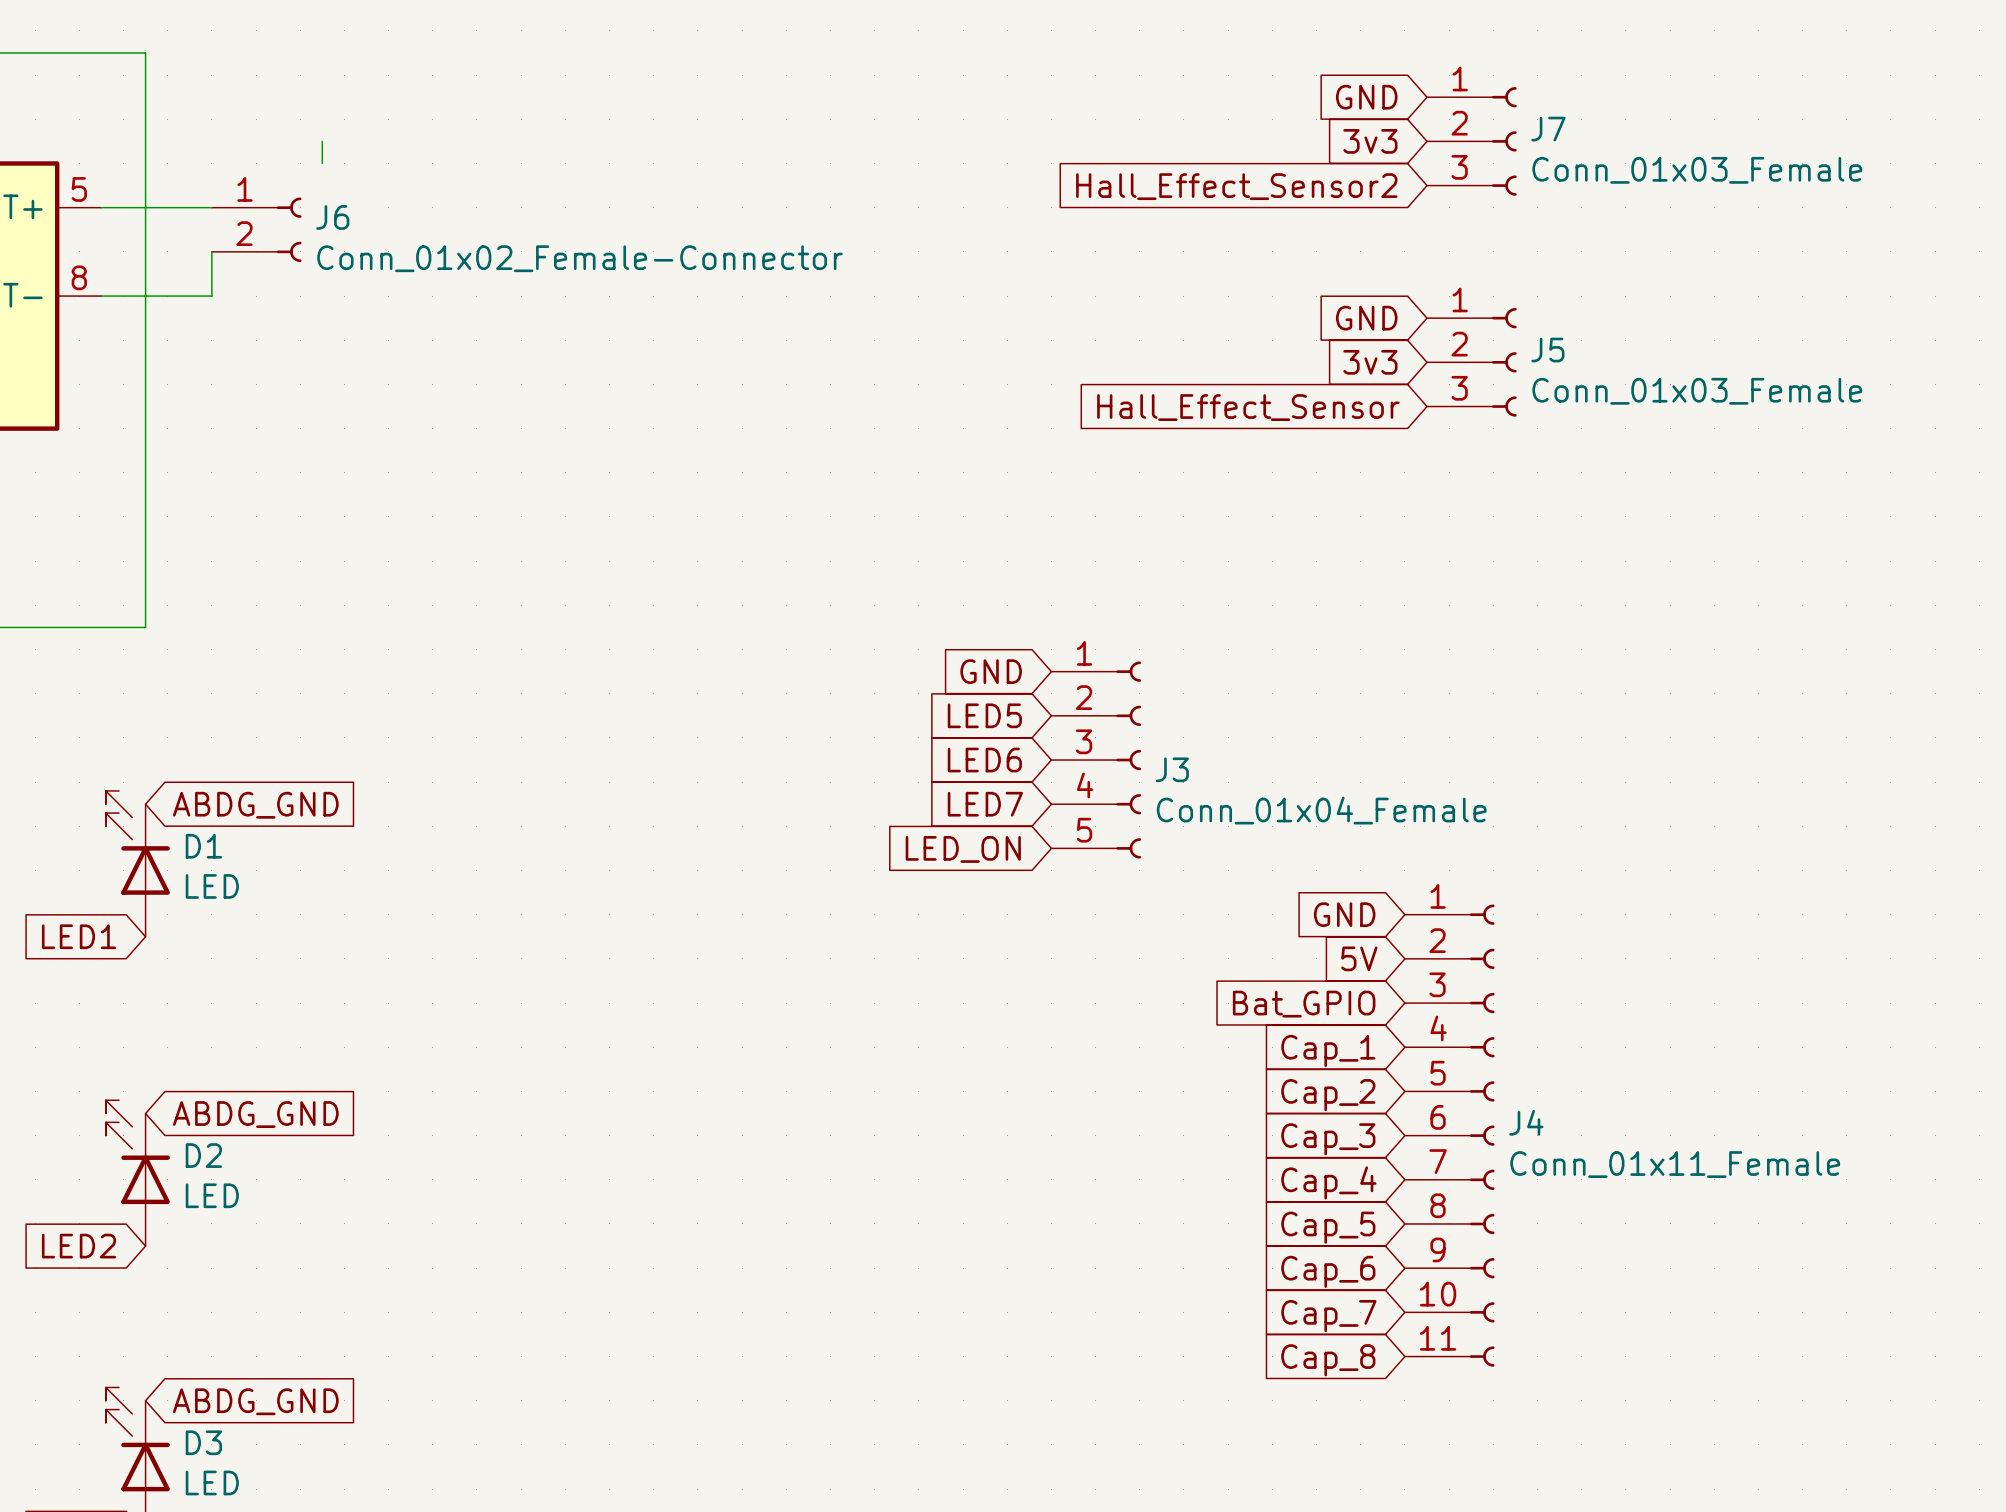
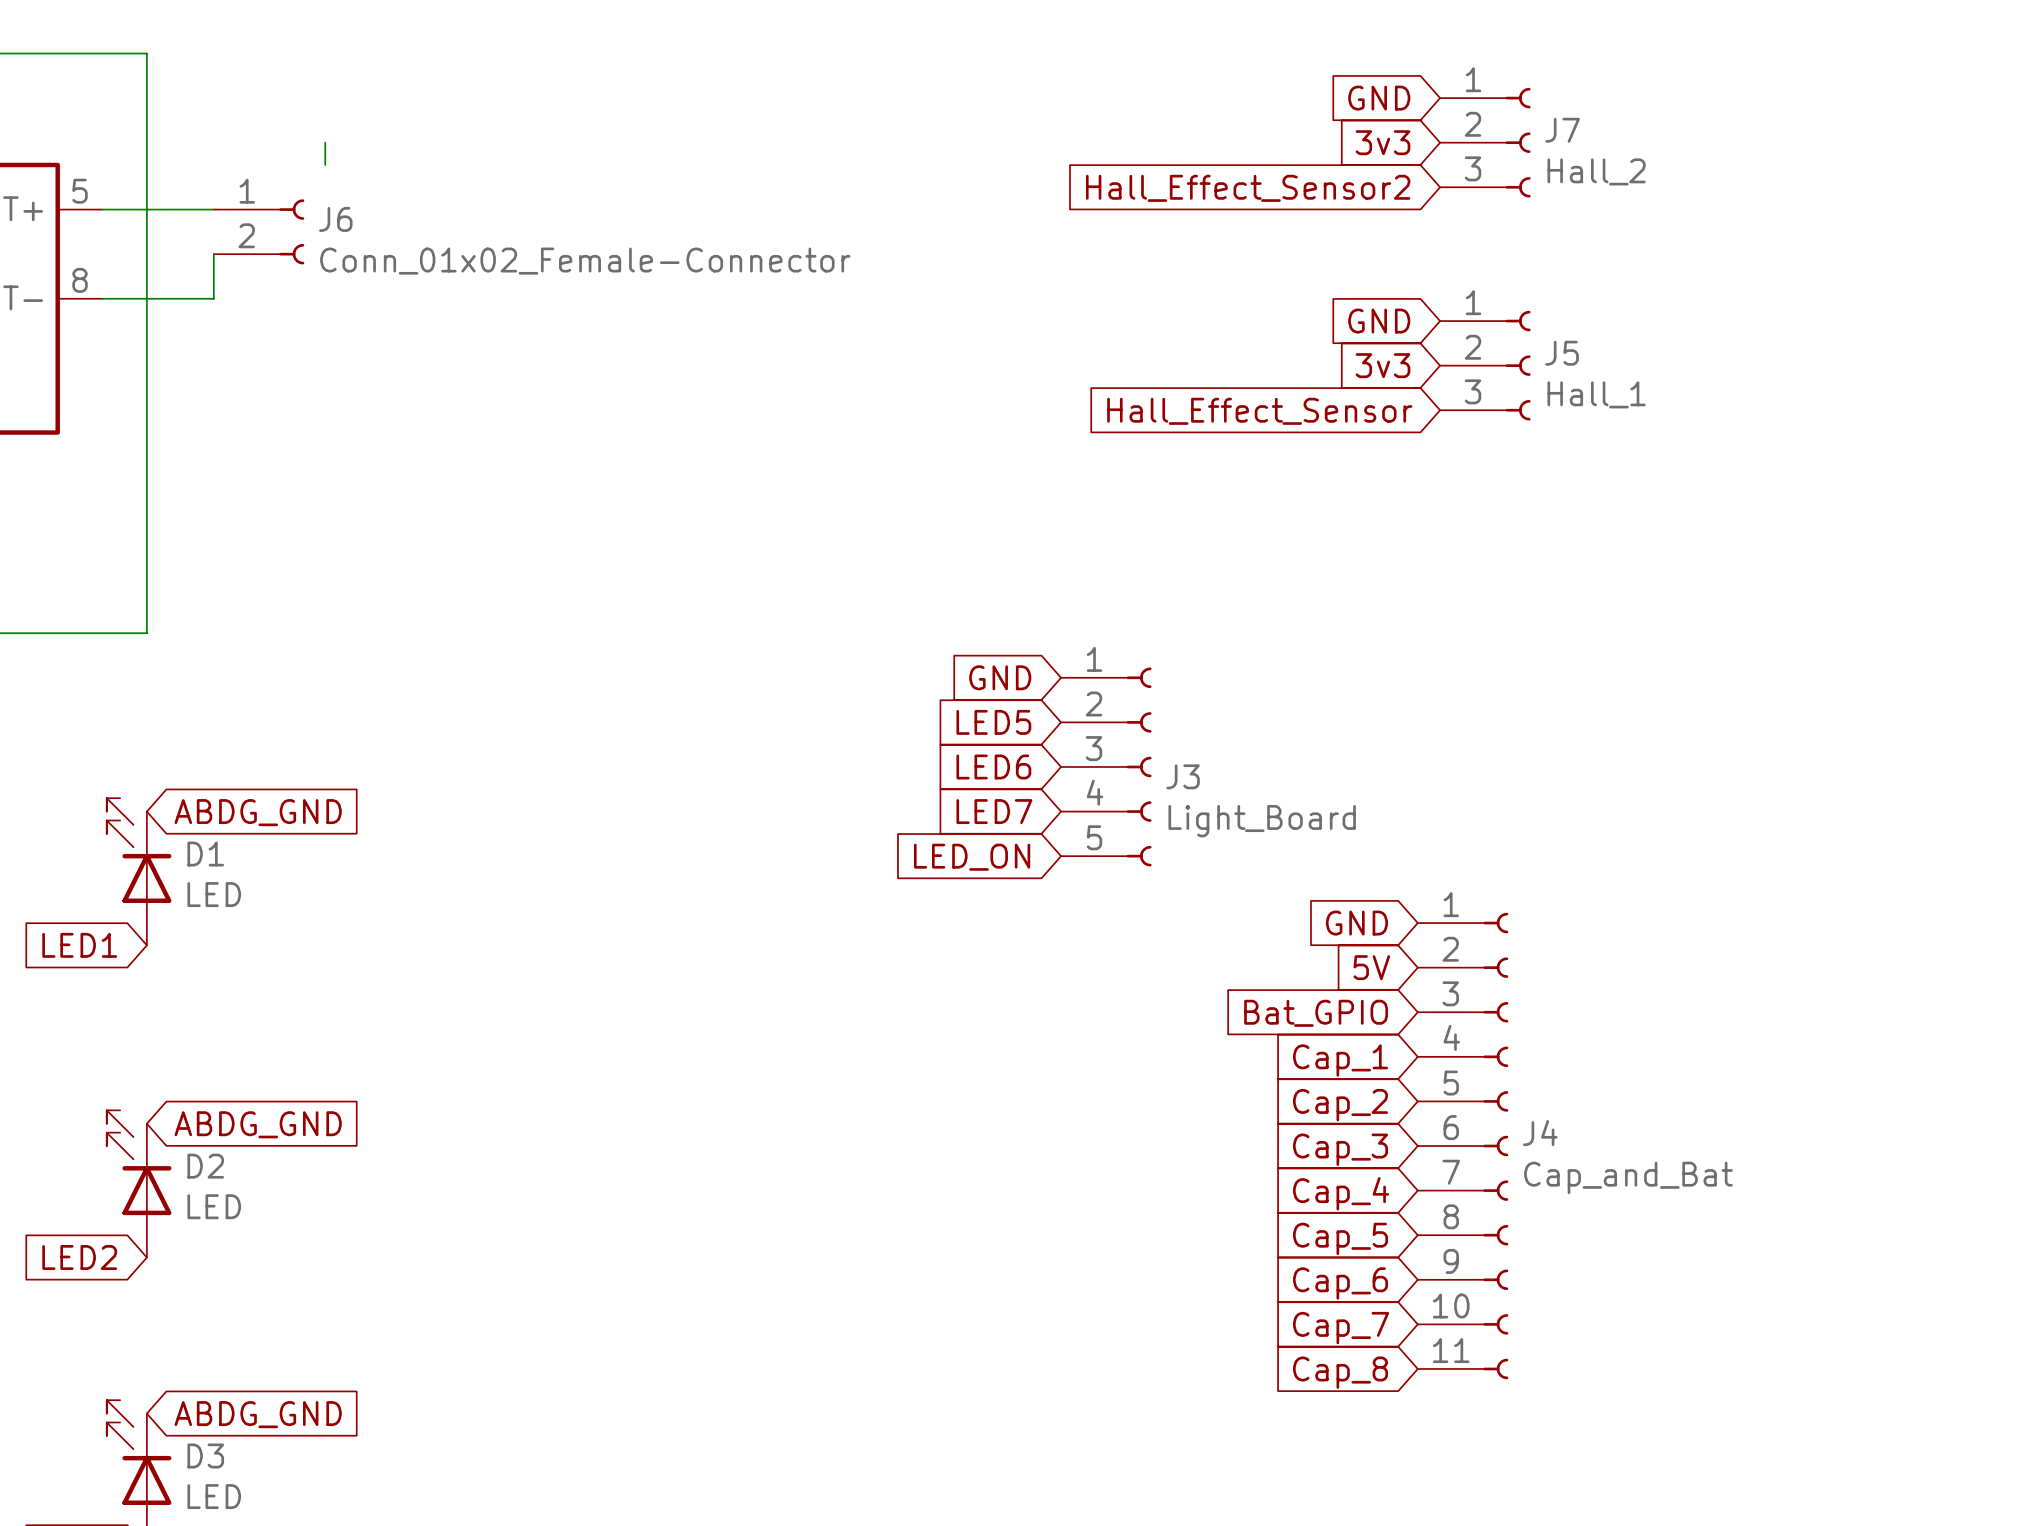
J7 value: Conn_01x03_Female (1697, 170) -> Hall_2 (1596, 171)
J5 value: Conn_01x03_Female (1697, 391) -> Hall_1 (1596, 394)
J3 value: Conn_01x04_Female (1321, 810) -> Light_Board (1262, 821)
J4 value: Conn_01x11_Female (1675, 1164) -> Cap_and_Bat (1628, 1177)

